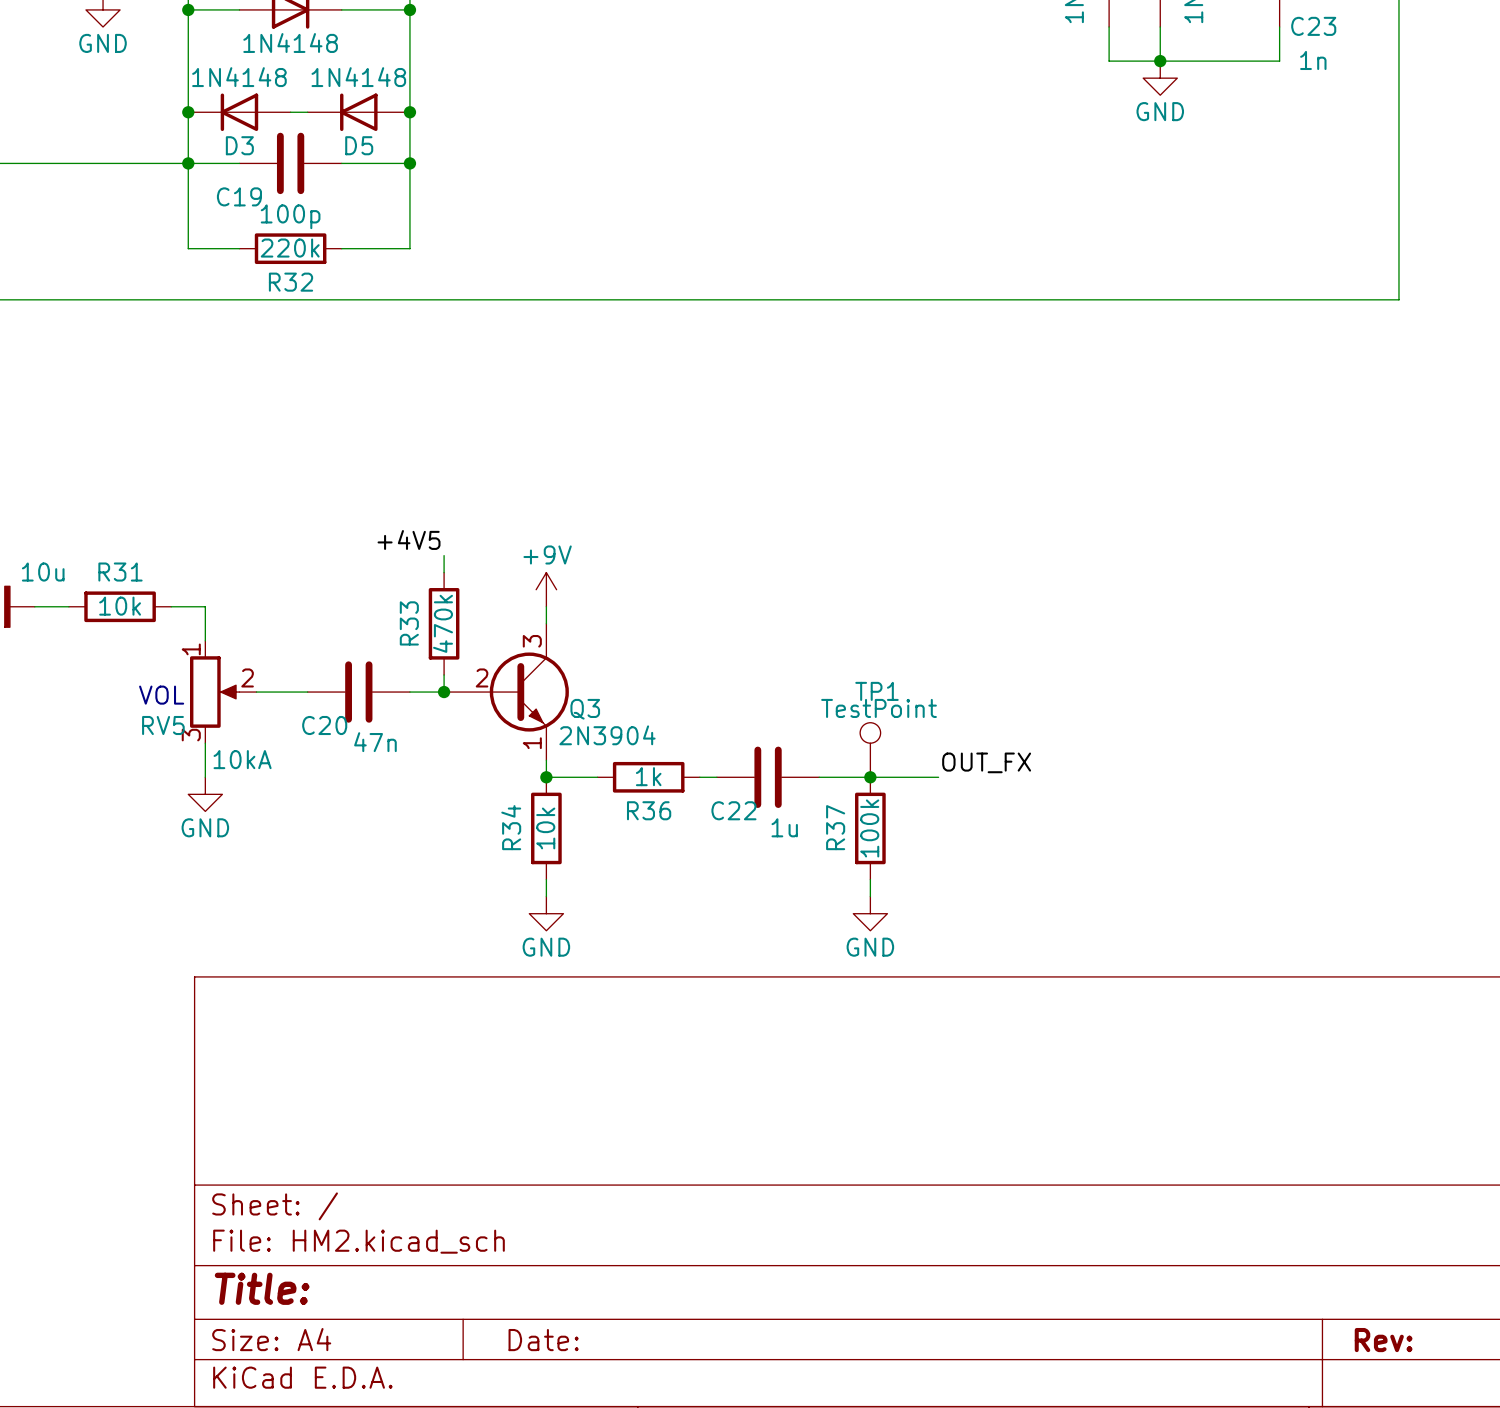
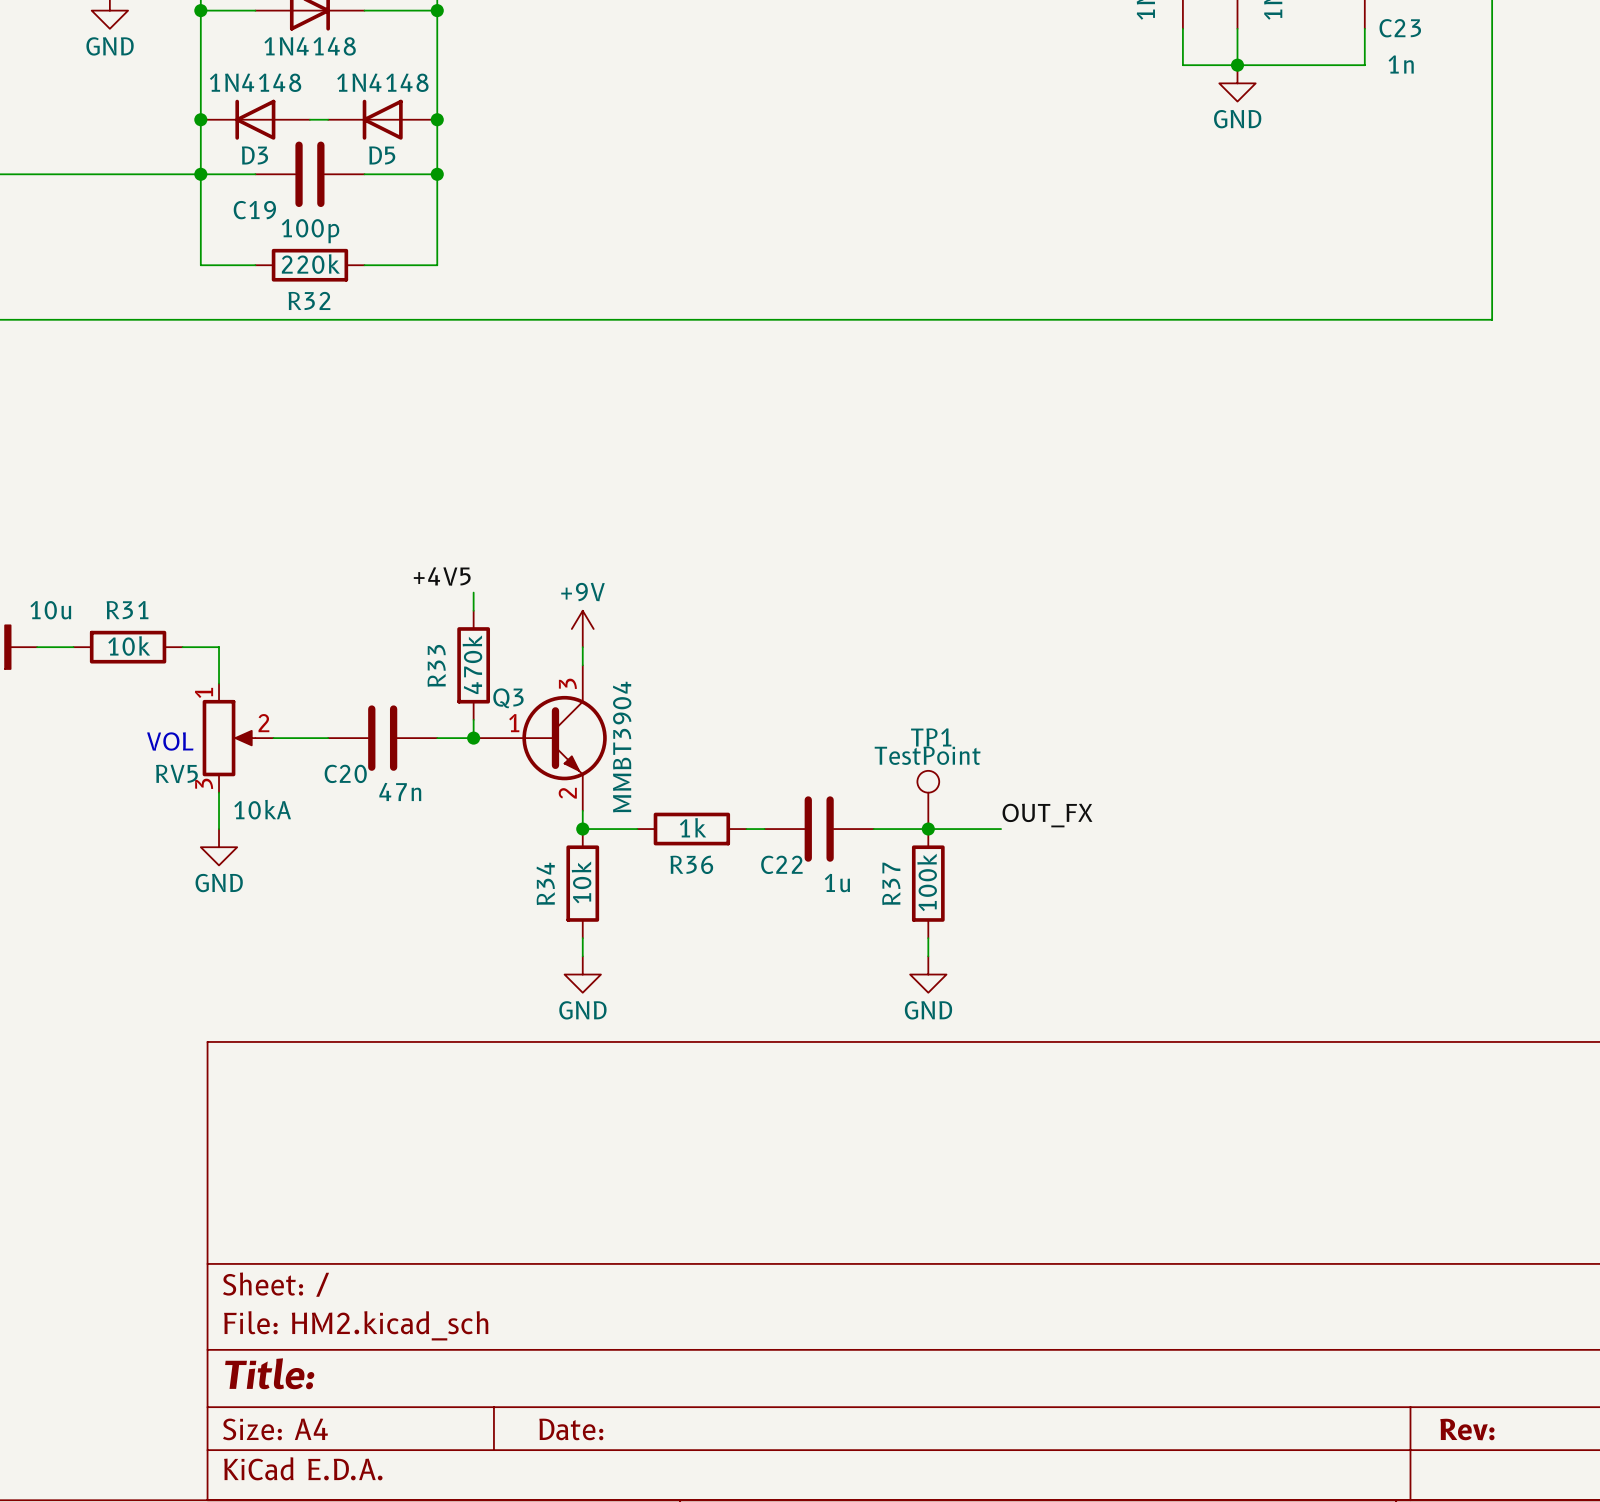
Q3 pin number: 2 (482, 677) -> 1 (514, 723)
Q3 name position: Q3 (585, 709) -> Q3 (508, 698)
Q3 value: 2N3904 (607, 735) -> MMBT3904 (622, 747)
Q3 pin number: 1 (532, 743) -> 2 (567, 793)

